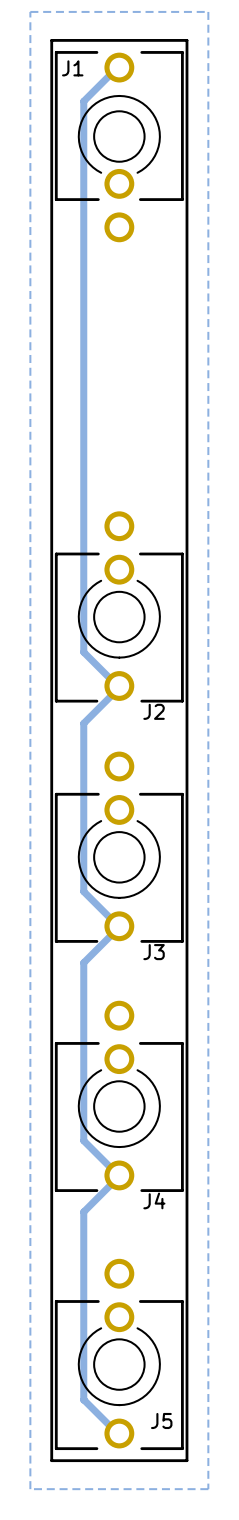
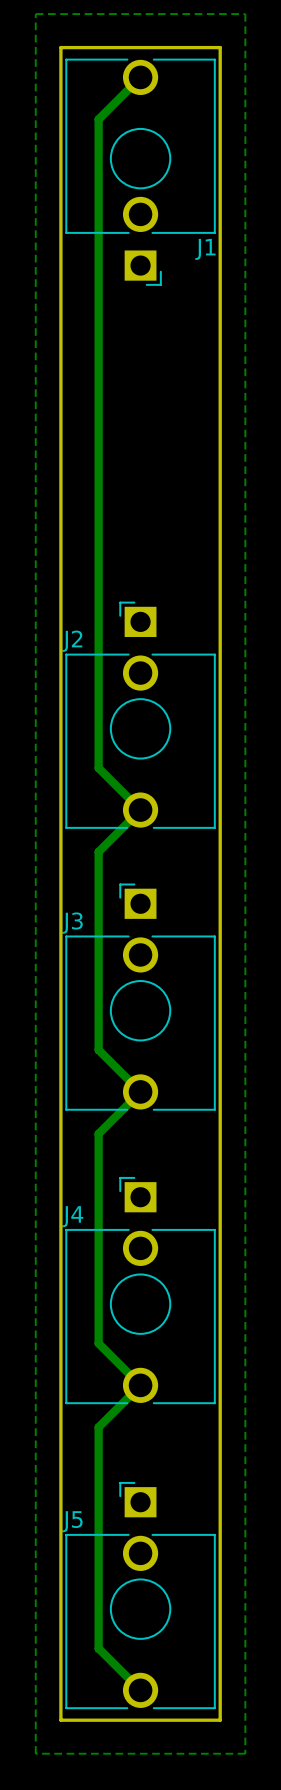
J1 footprint: [54, 51, 184, 243] -> [65, 58, 216, 286]
J1 name position: J1 (72, 68) -> J1 (205, 249)
J2 footprint: [54, 511, 184, 703] -> [65, 601, 216, 829]
J2 name position: J2 (154, 711) -> J2 (72, 641)
J3 footprint: [54, 751, 184, 943] -> [65, 883, 216, 1111]
J3 name position: J3 (154, 952) -> J3 (72, 923)
J4 footprint: [54, 1000, 184, 1192] -> [65, 1176, 216, 1405]
J4 name position: J4 (154, 1200) -> J4 (72, 1216)
J5 footprint: [54, 1258, 184, 1451] -> [65, 1481, 216, 1710]
J5 name position: J5 (161, 1420) -> J5 (72, 1521)

